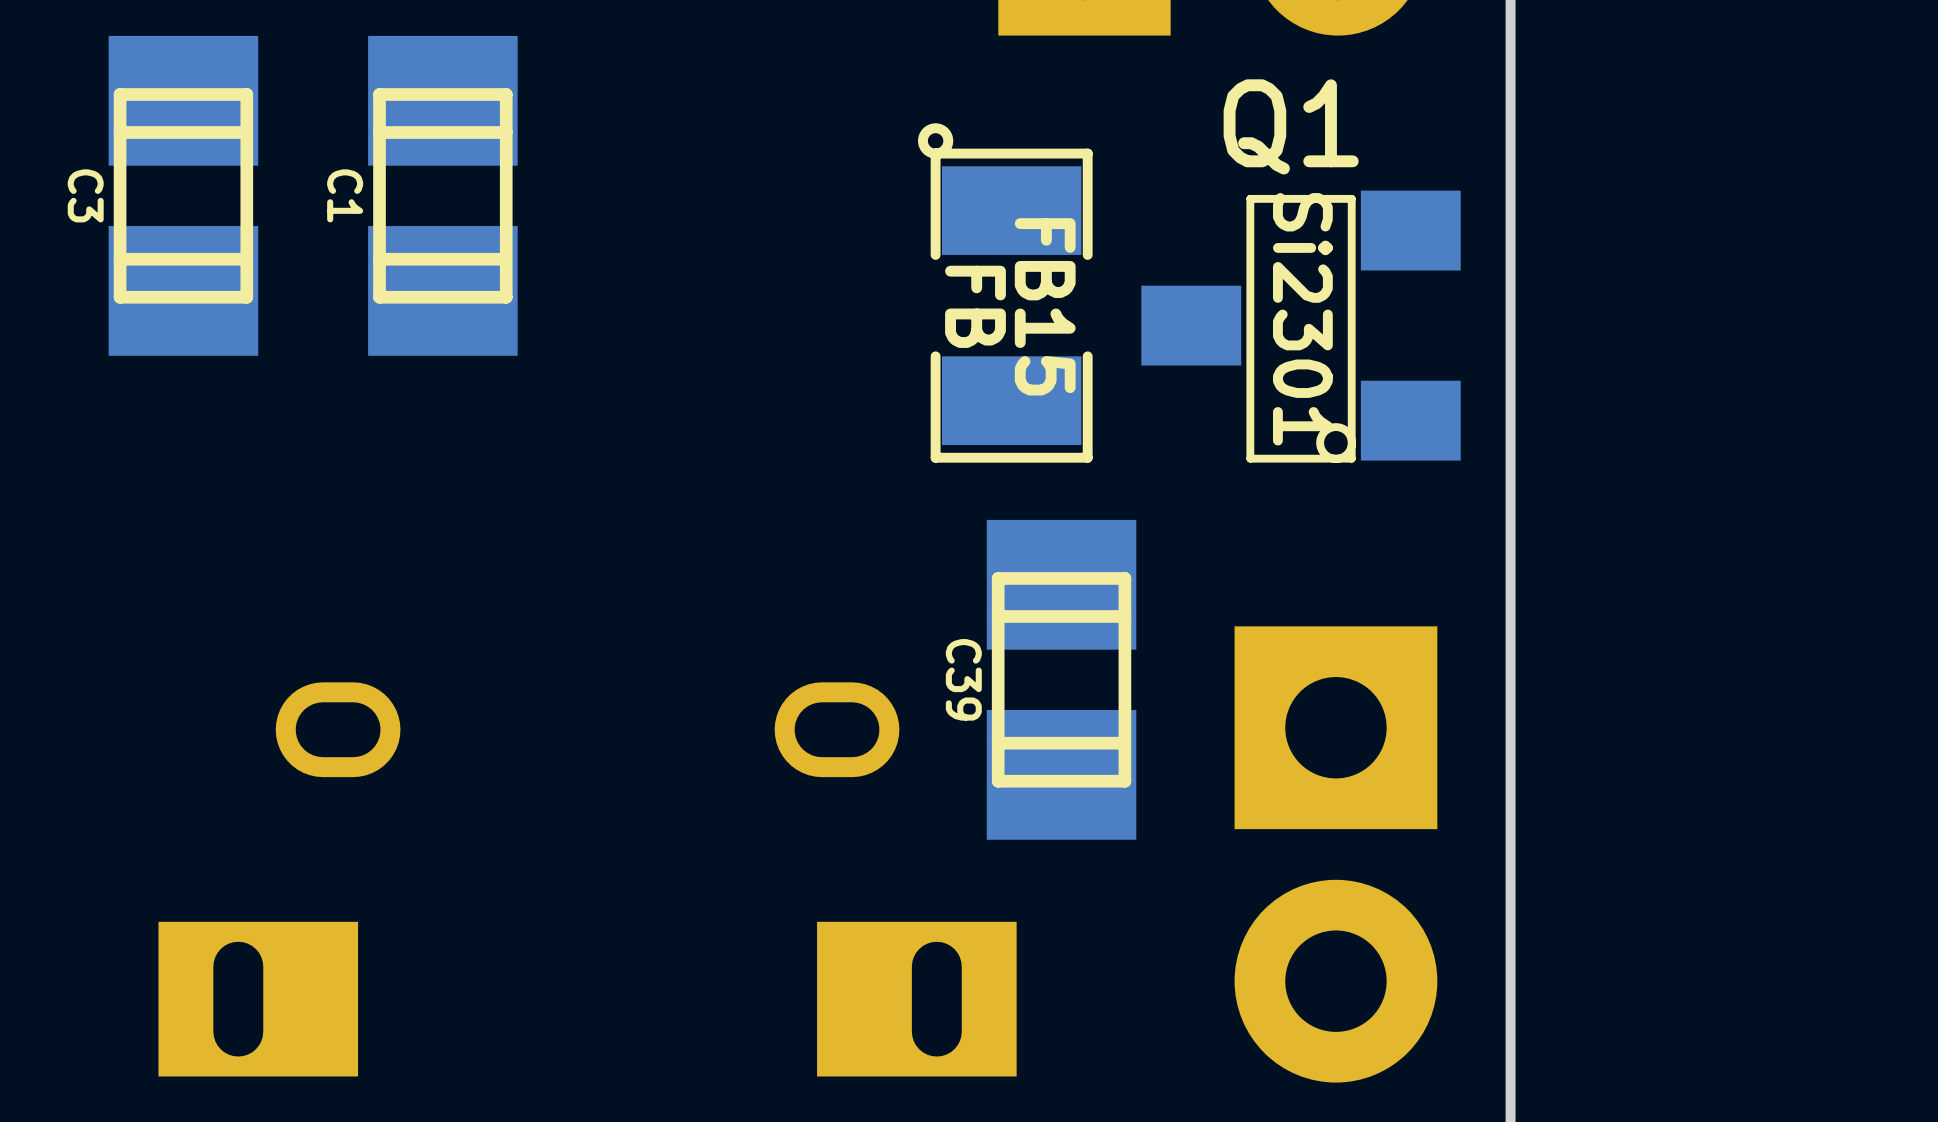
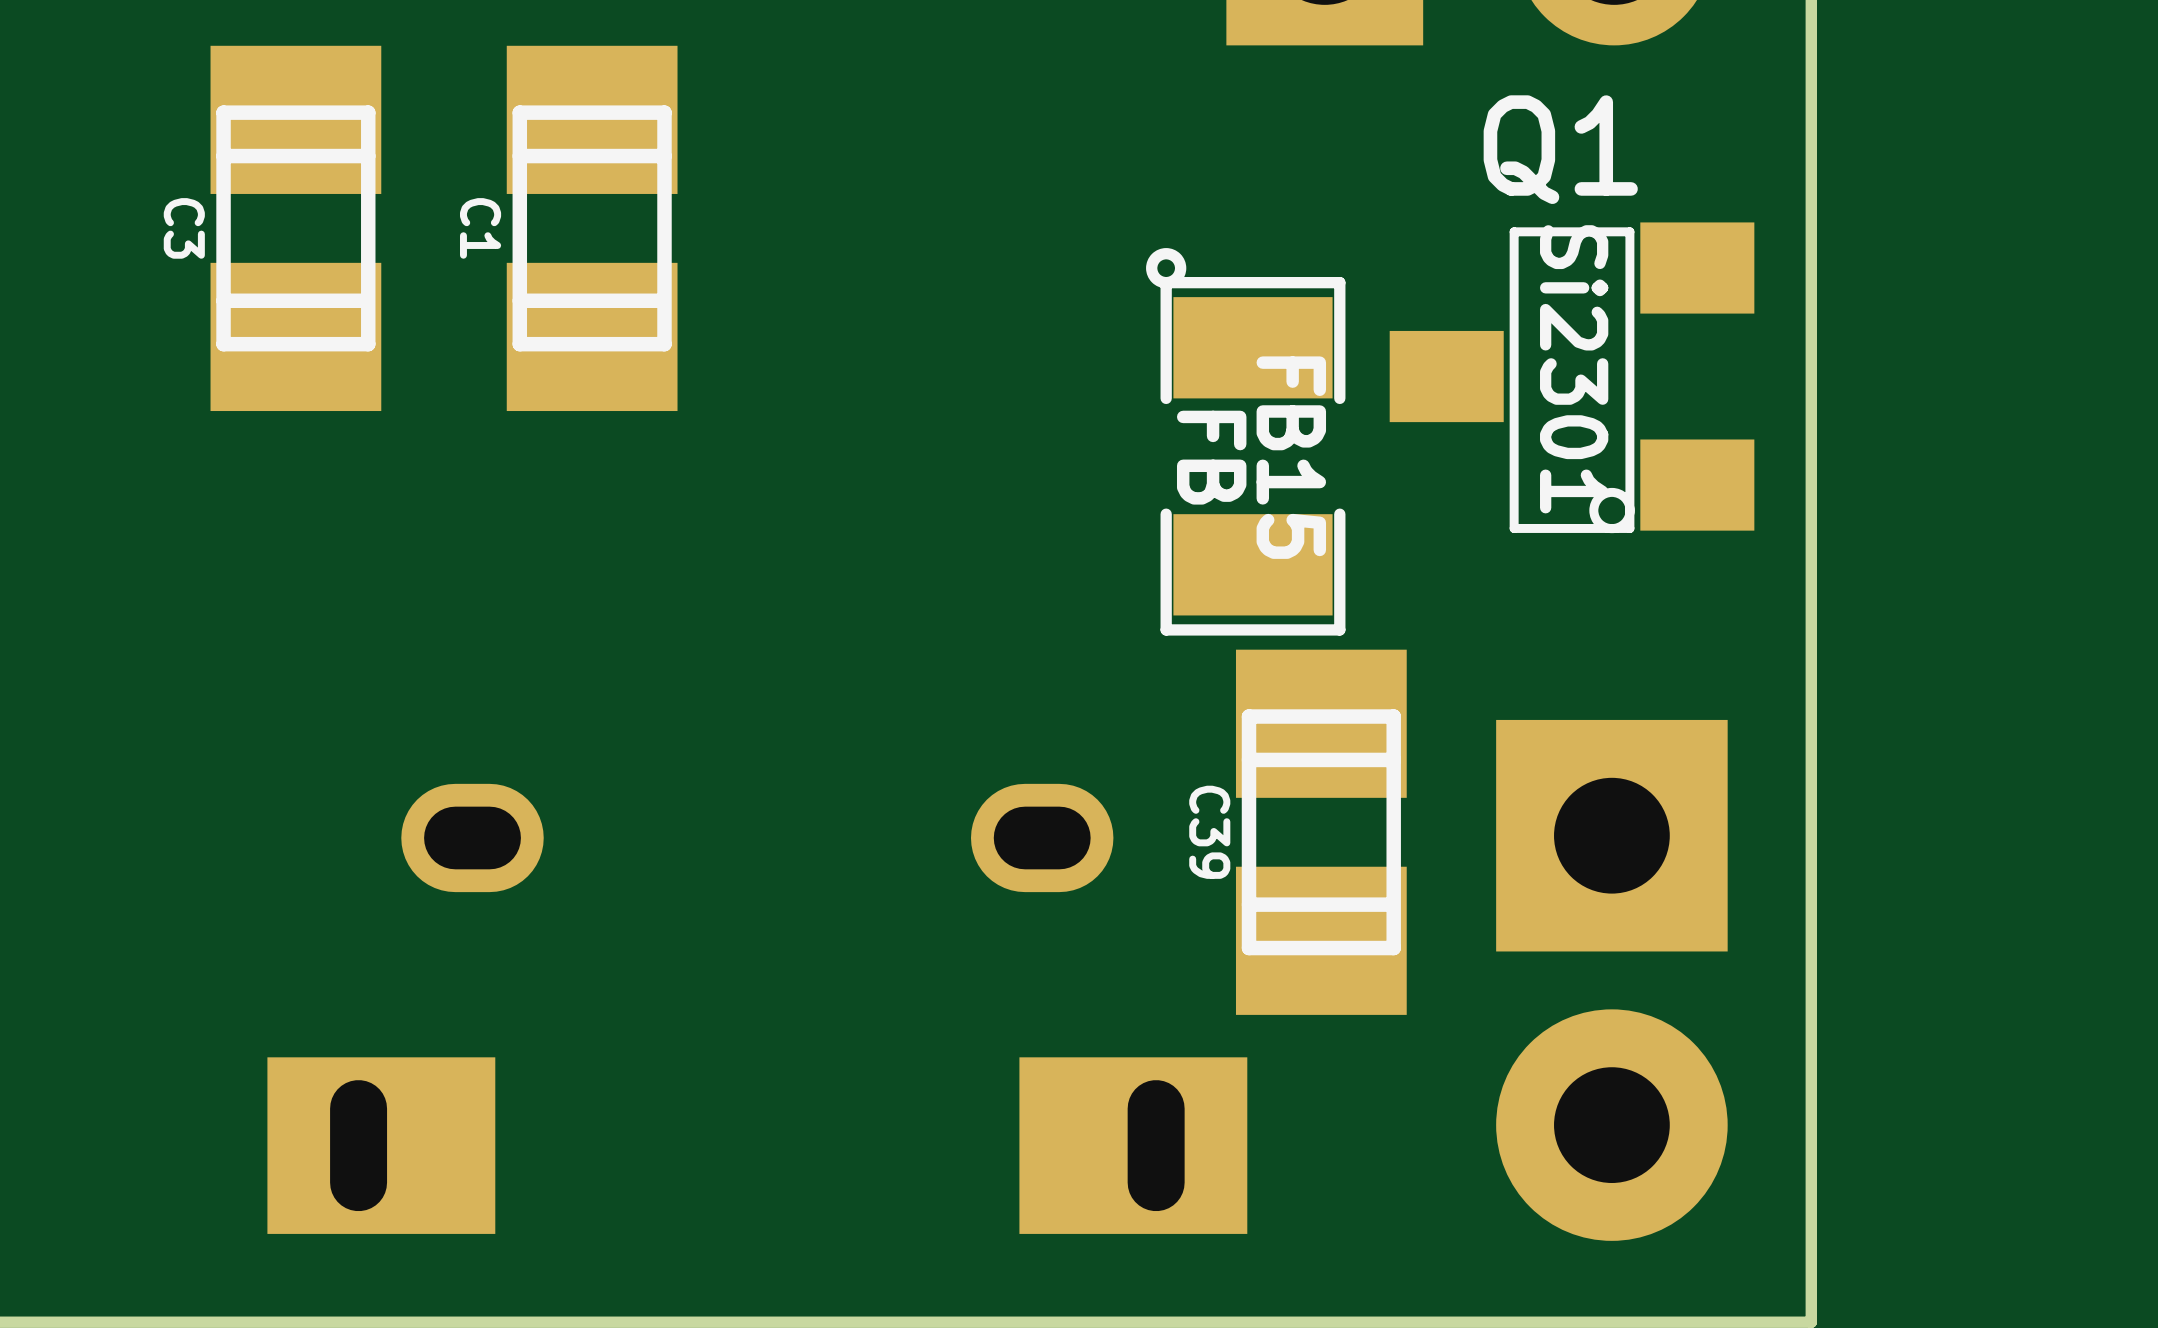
FB15 position: (1005, 292) -> (1245, 441)
C39 position: (1061, 679) -> (1321, 832)

